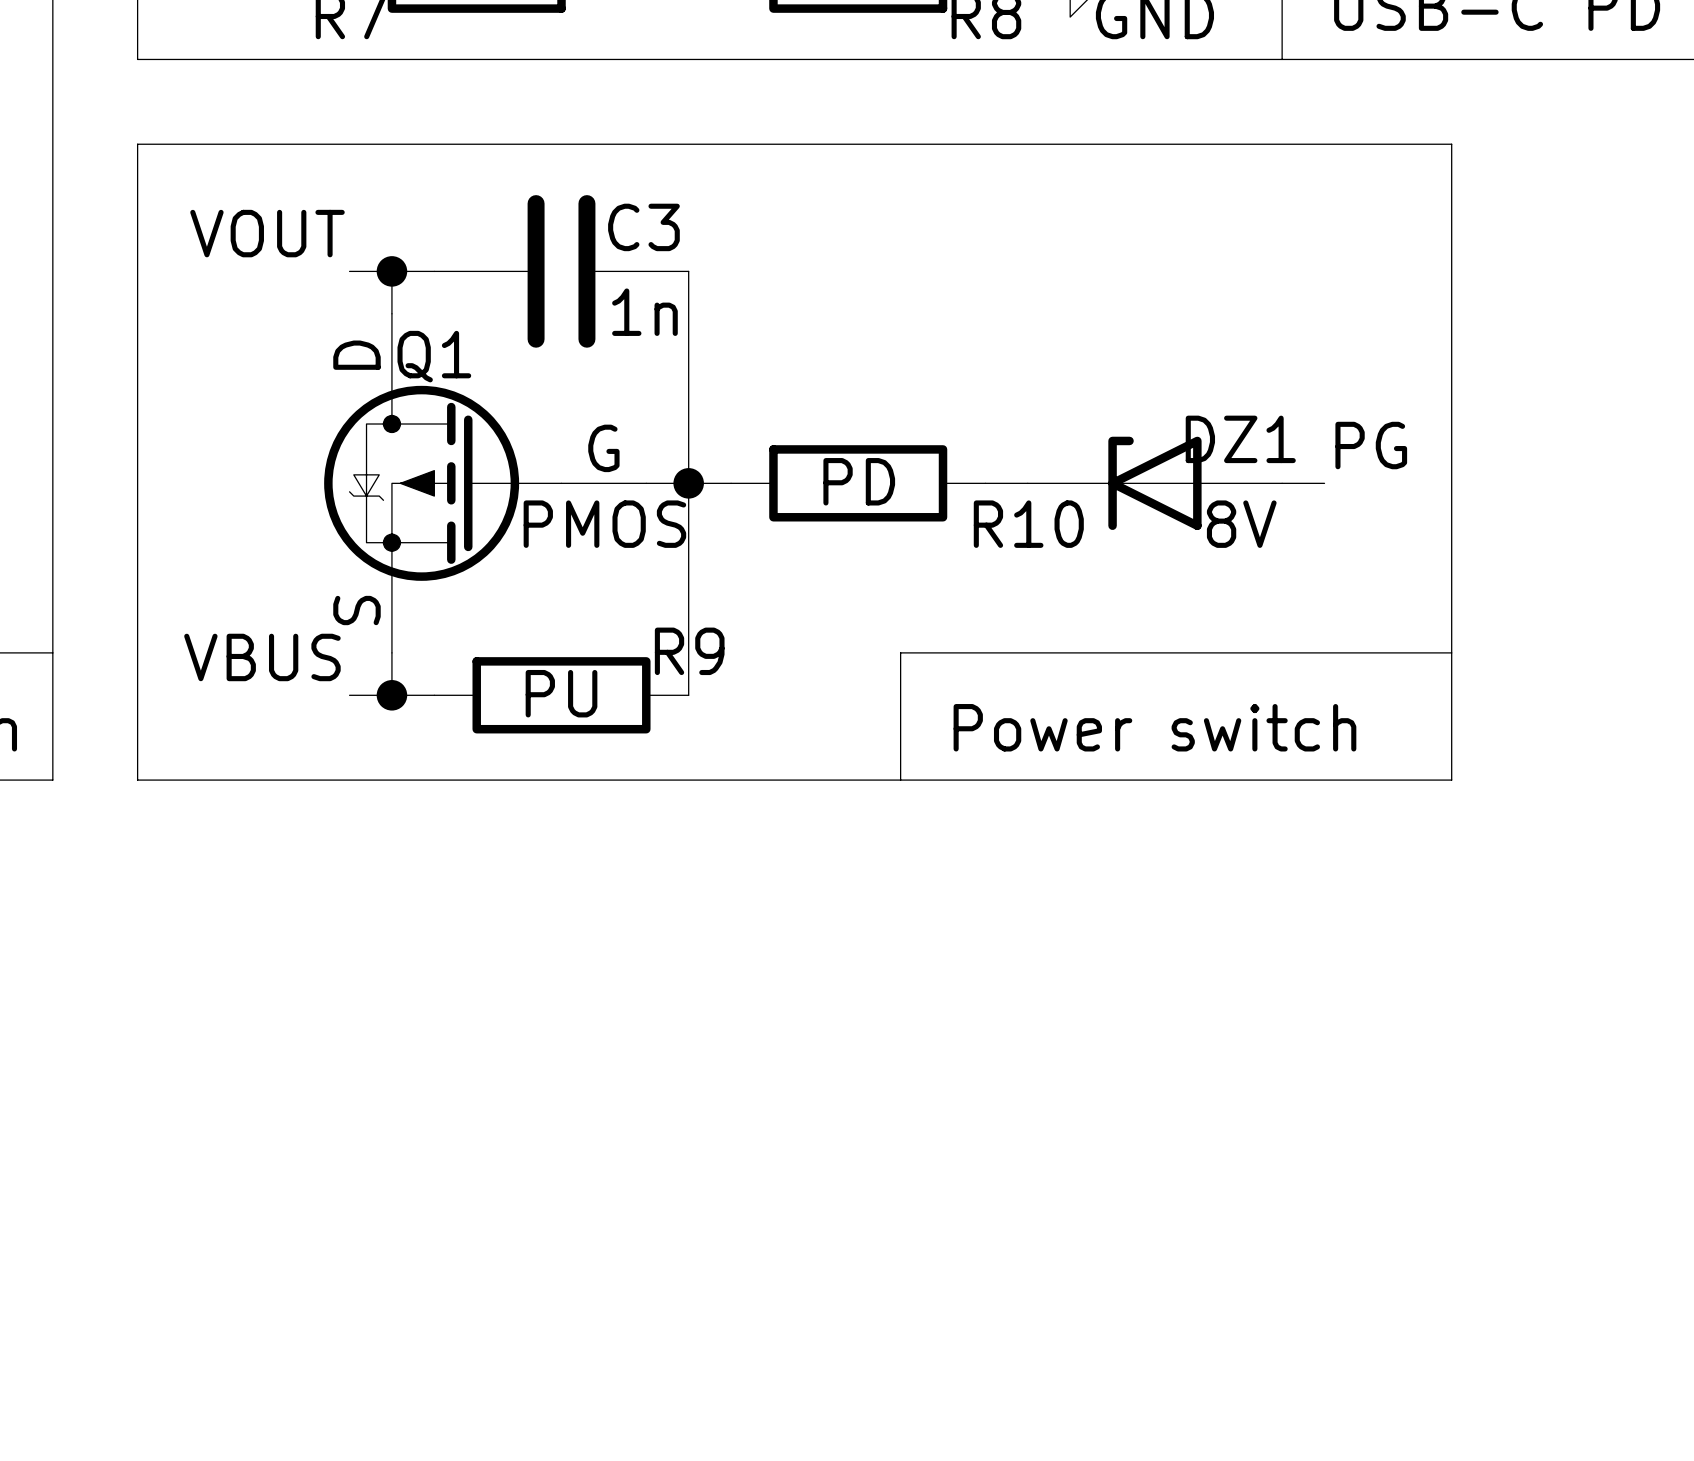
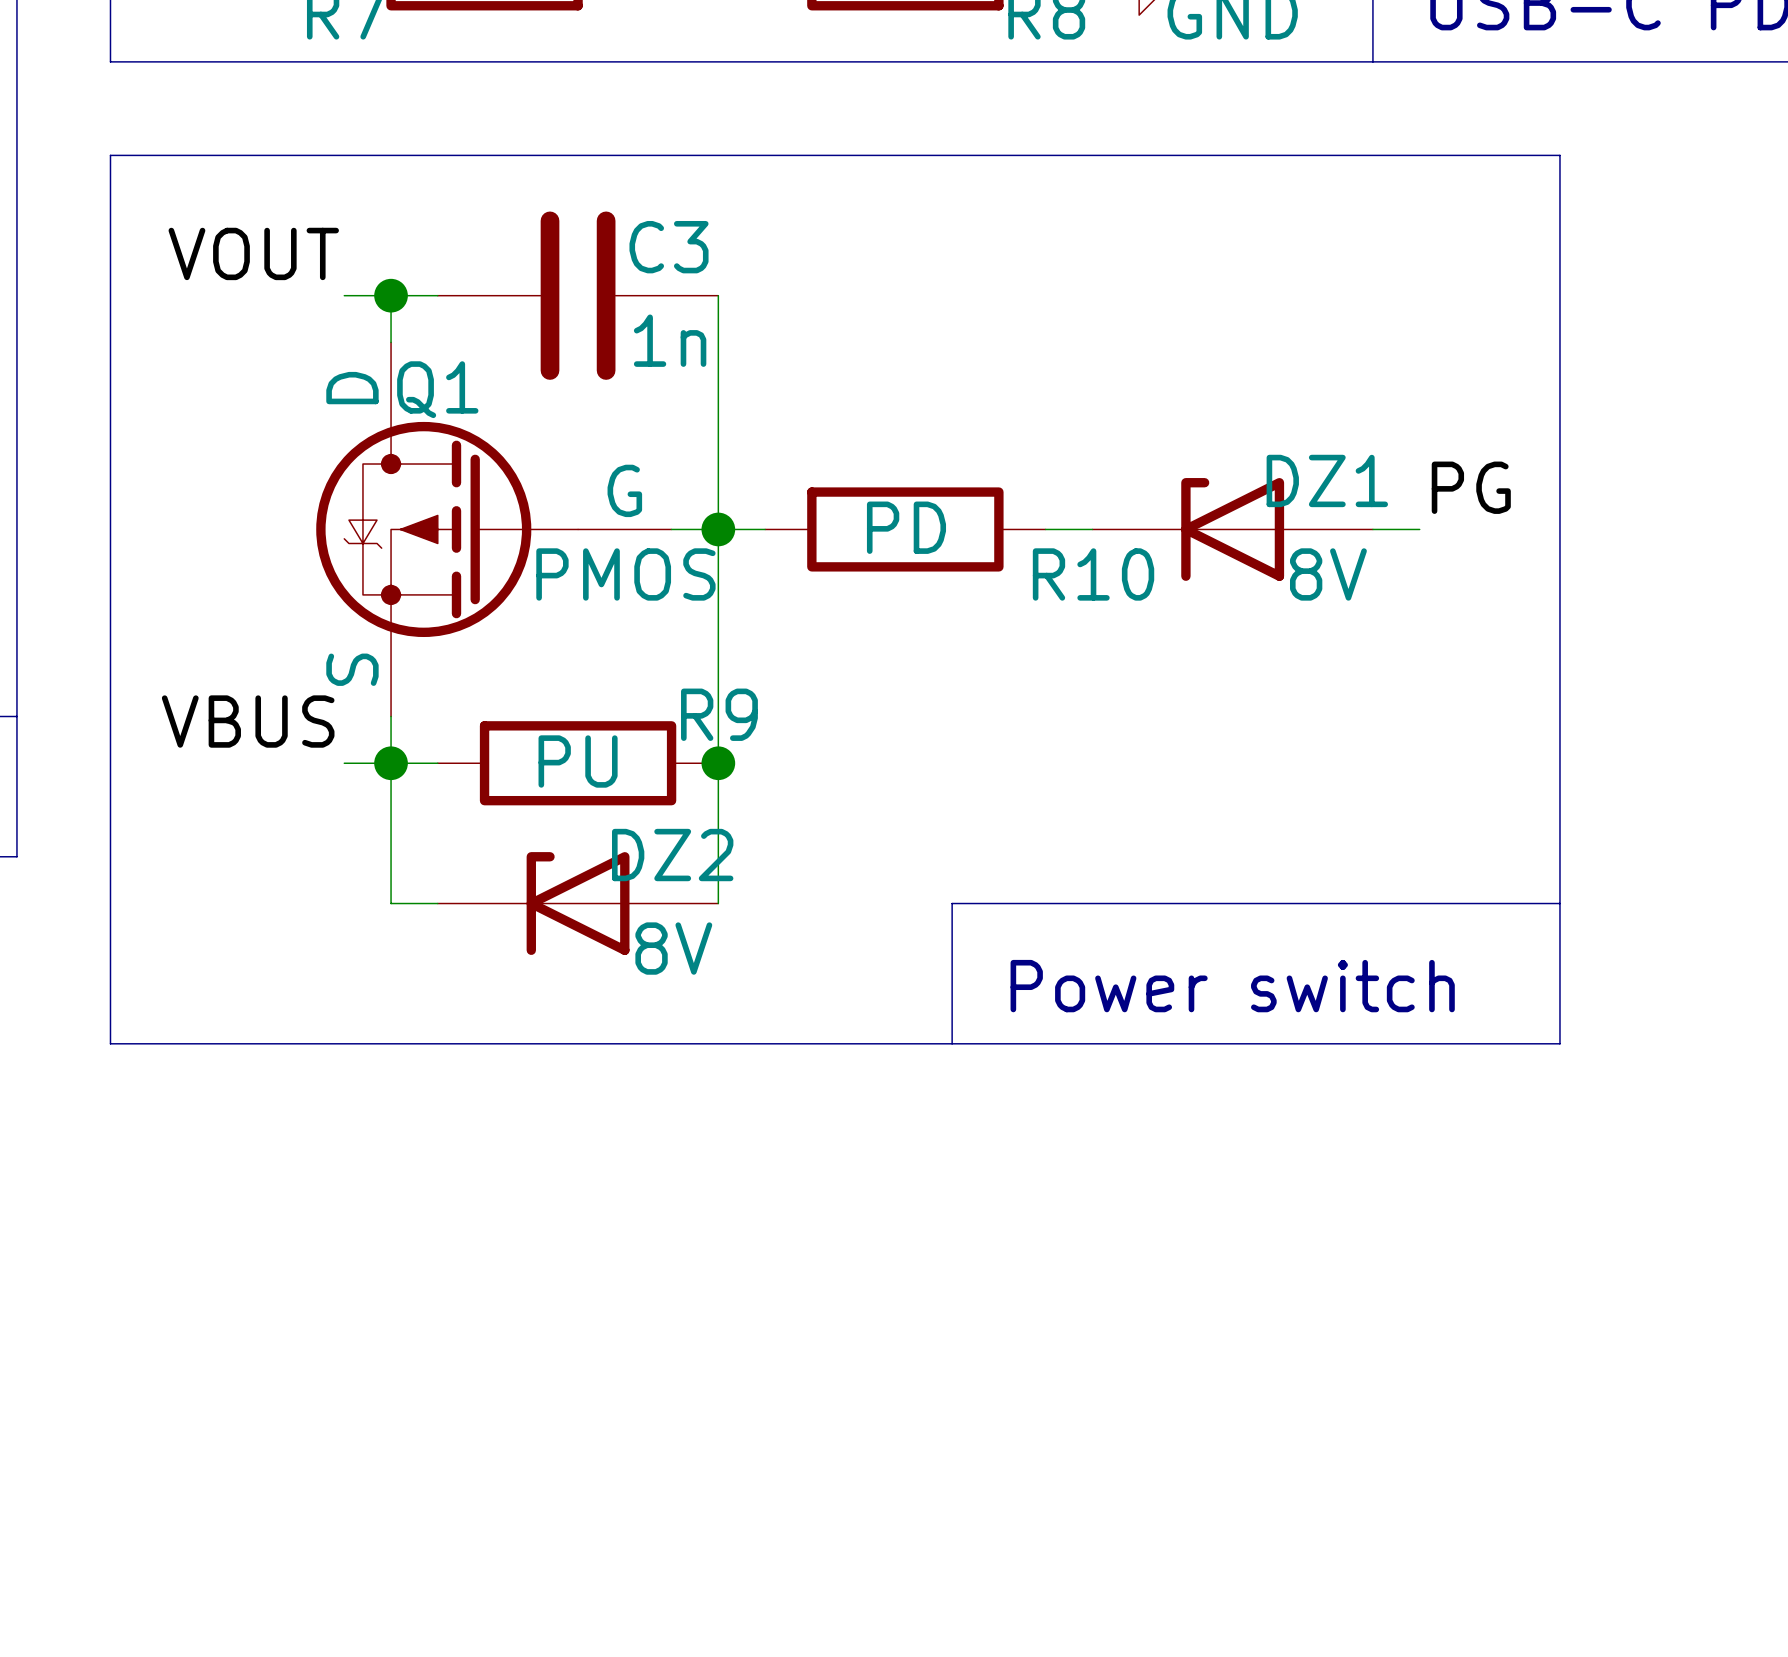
line: (1451, 652) (900, 652) (900, 780) -> (1559, 903) (952, 903) (952, 1043)
wire: none -> (391, 763) (391, 903) (437, 903)
wire: none -> (718, 763) (718, 903)
junction: none -> (718, 763)
text position: Power switch (1154, 727) -> Power switch (1232, 986)
line: (137, 780) (1451, 780) -> (110, 856) (110, 1043) (1559, 1043) (1559, 856)
DZ2: none -> 8V (578, 903)

